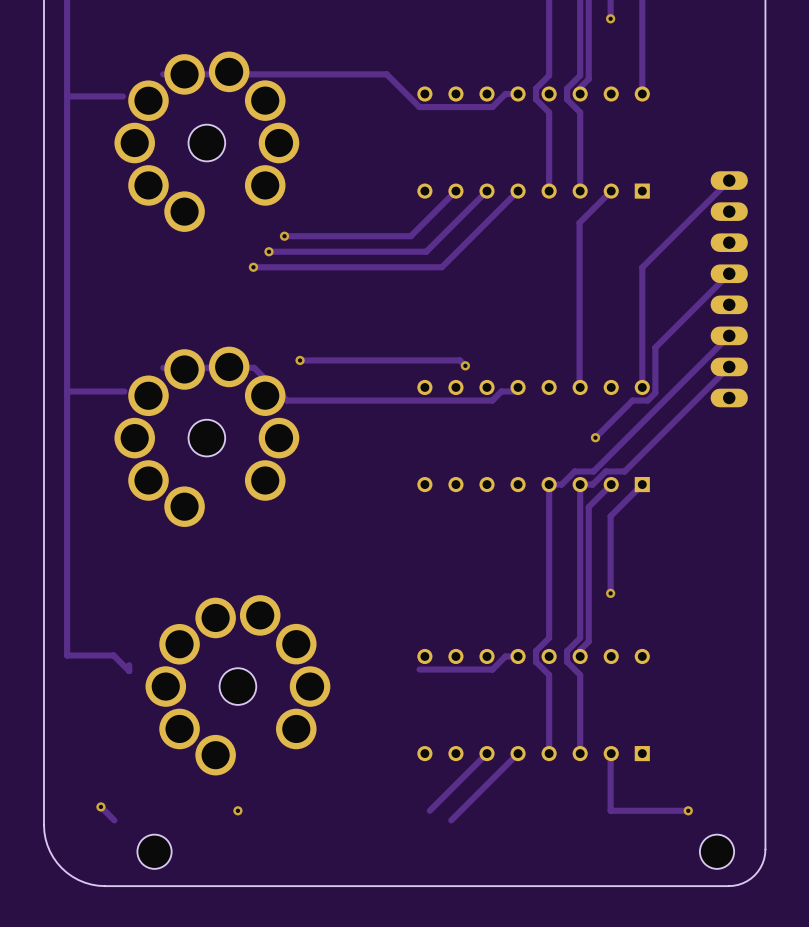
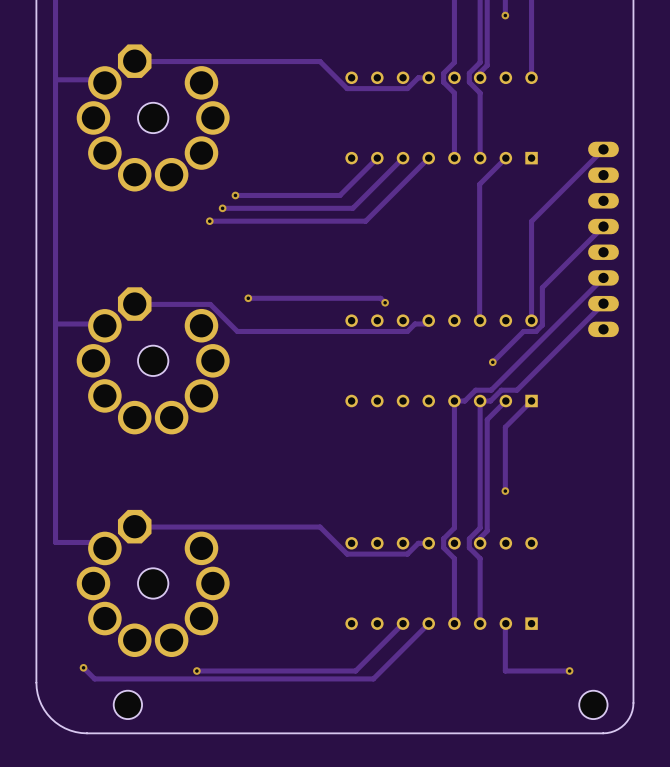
part: (206, 141) -> none
part: none -> (153, 117)
part: none -> (153, 360)
part: (206, 436) -> none
track: none -> (134, 526) (320, 527) (347, 554)
part: (237, 685) -> none
part: none -> (153, 583)
track: none -> (355, 671) (196, 671)
track: none -> (373, 678) (94, 678)

